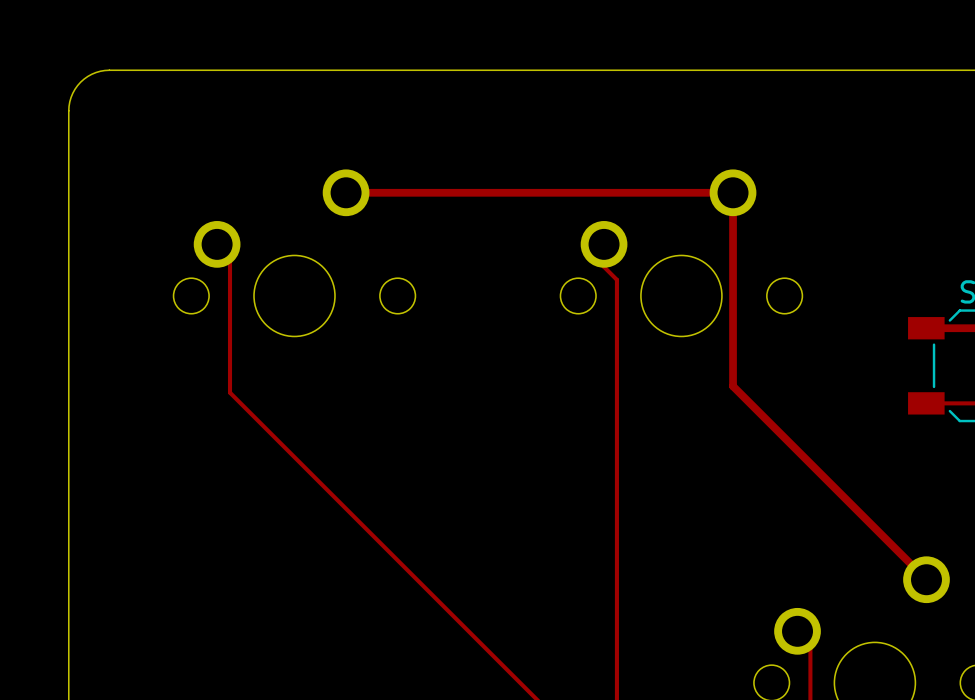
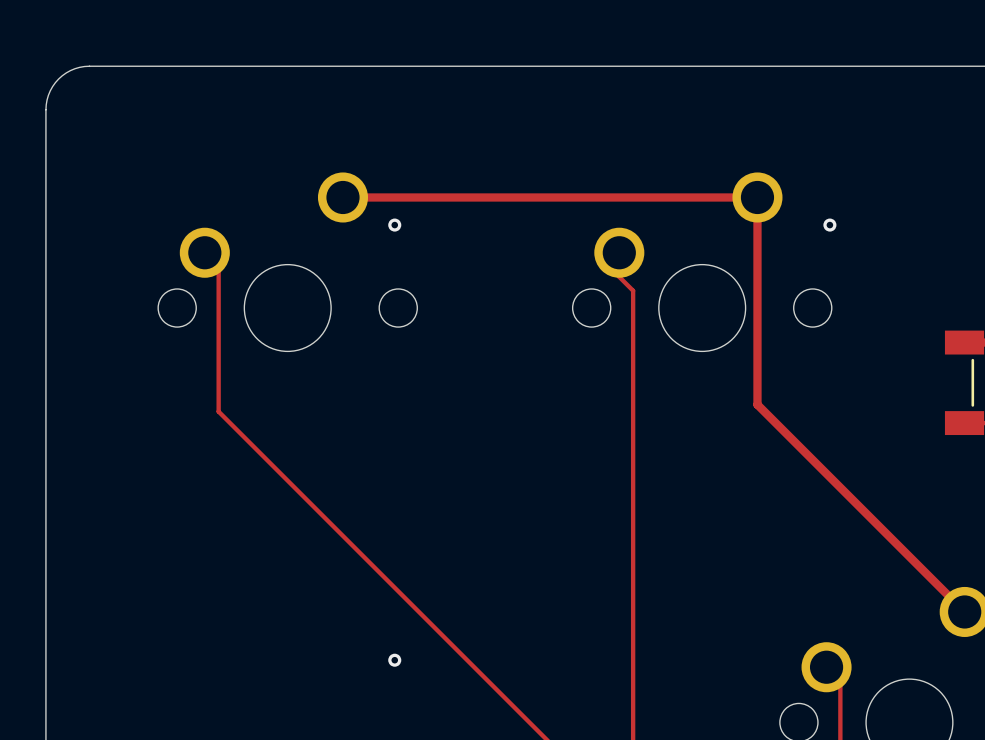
via: none -> (394, 225)
via: none -> (829, 225)
via: none -> (394, 660)

